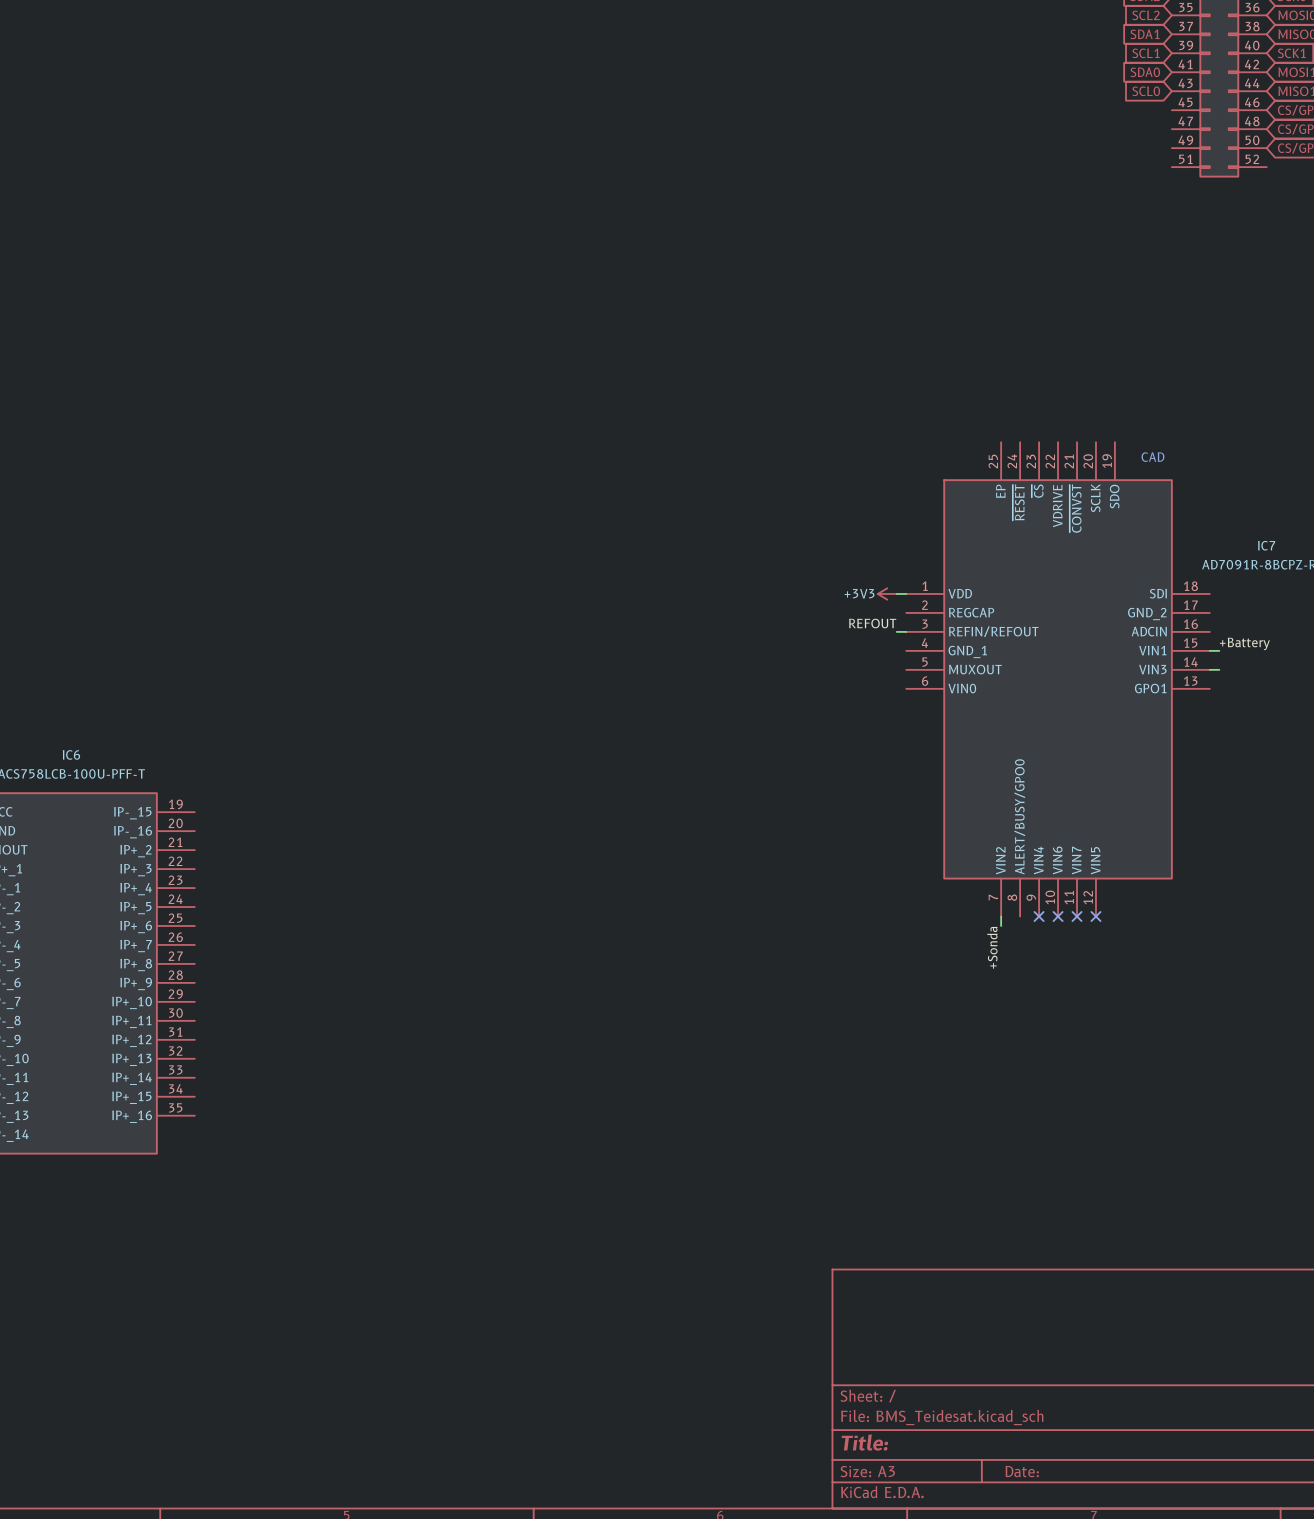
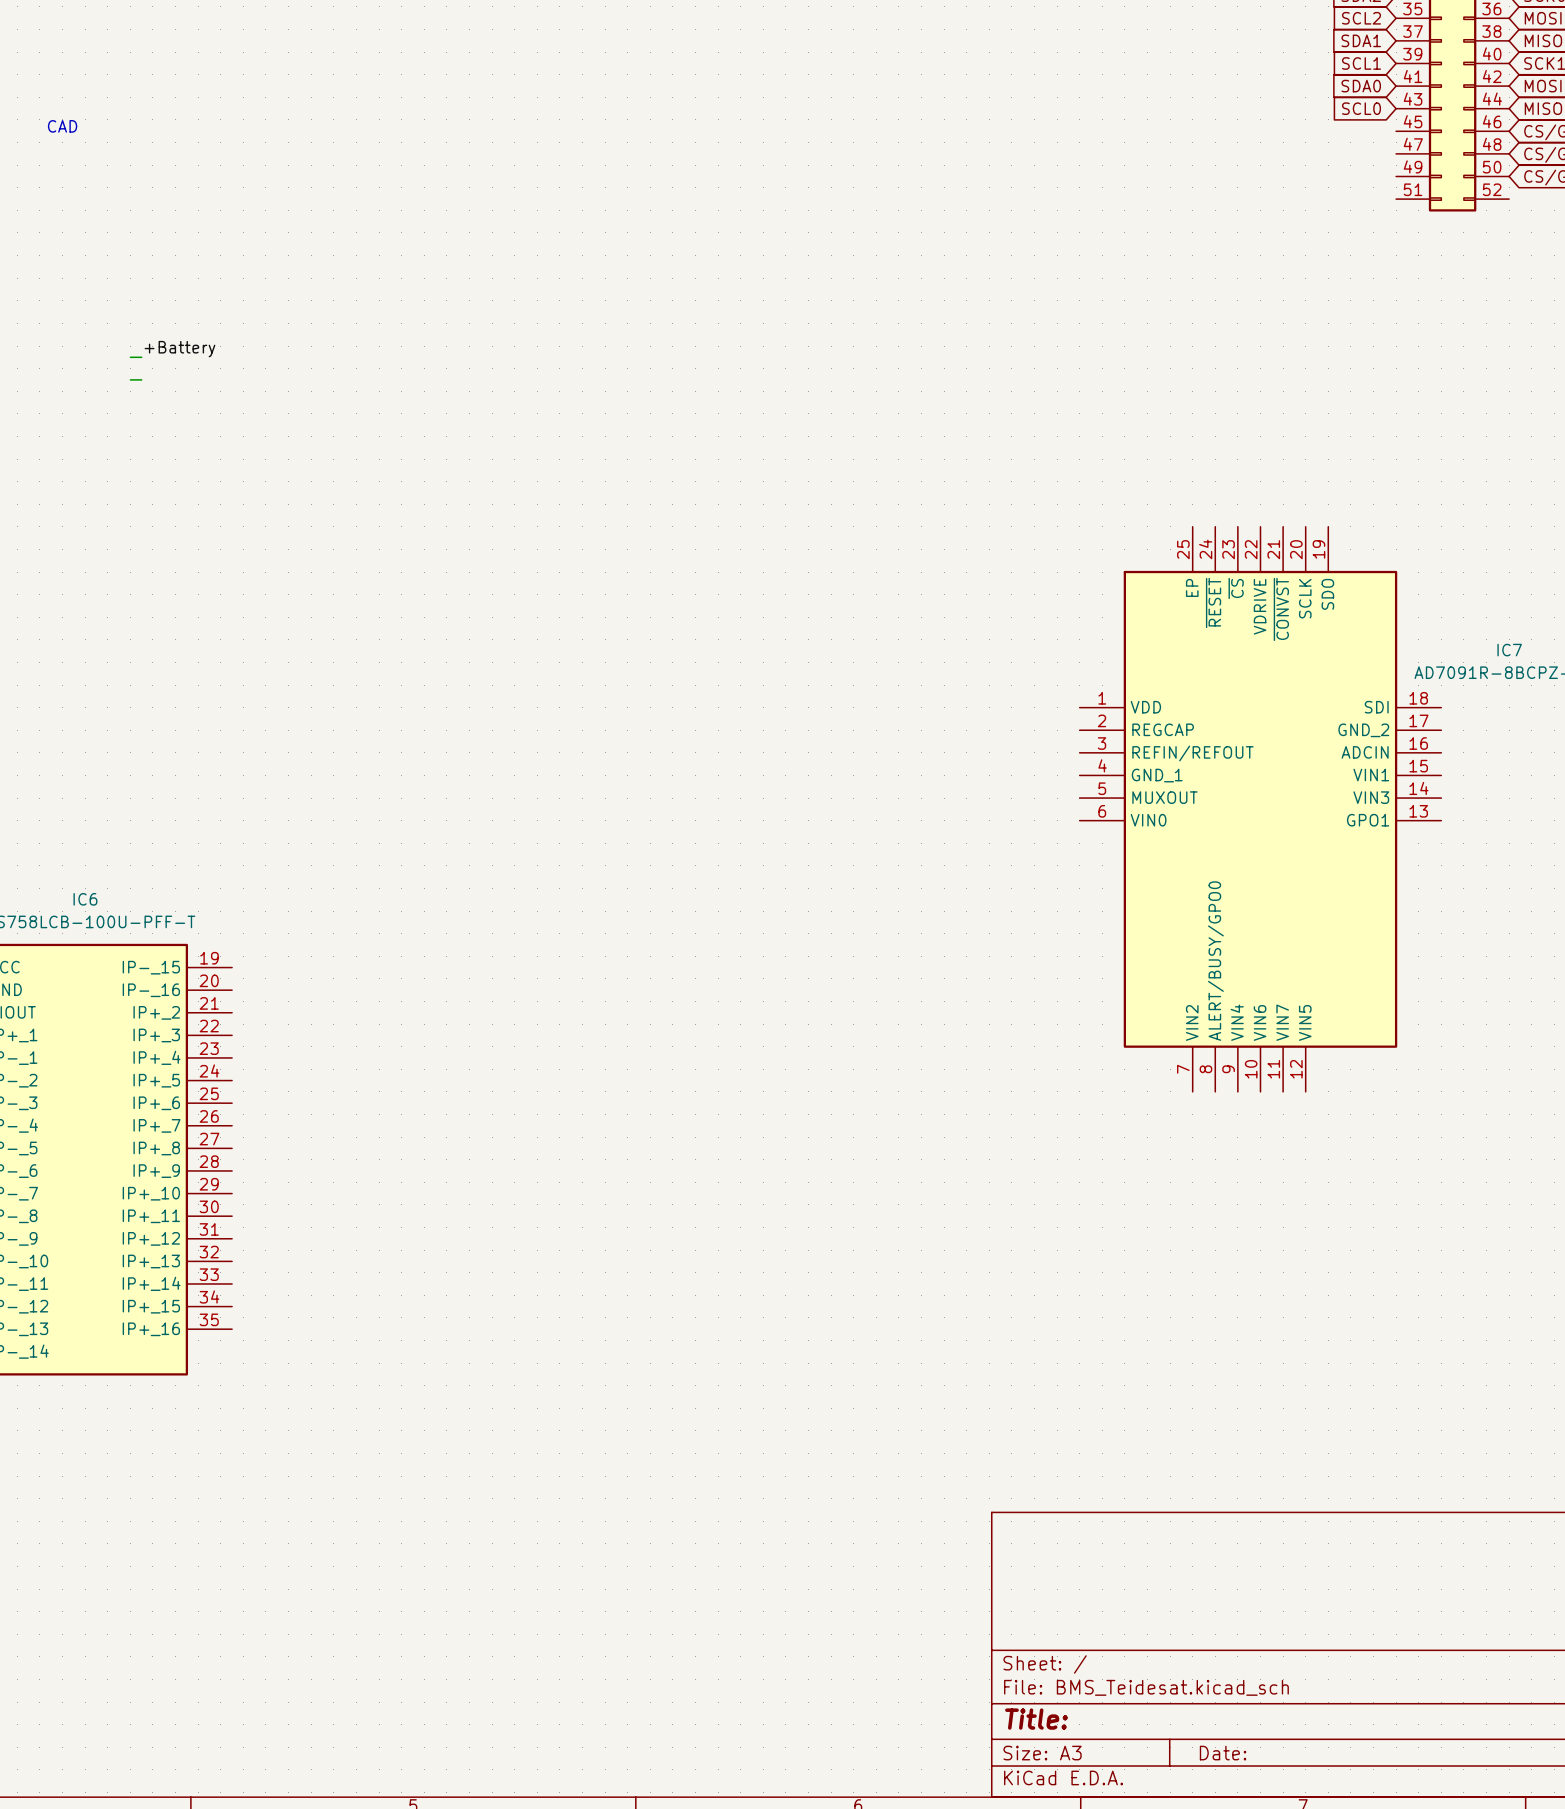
text: none -> CAD (62, 126)
label: none -> +Battery (179, 349)
wire: none -> (130, 357) (141, 357)
wire: none -> (130, 379) (141, 379)
text: CAD (1152, 457) -> none
power symbol: +3V3 (887, 593) -> none
wire: (896, 593) (906, 593) -> none
label: REFOUT (872, 623) -> none
wire: (896, 631) (906, 631) -> none
label: +Battery (1244, 643) -> none
wire: (1209, 650) (1219, 650) -> none
wire: (1209, 669) (1219, 669) -> none
wire: (1001, 916) (1001, 925) -> none
no-connect mark: (1039, 916) -> none
no-connect mark: (1058, 916) -> none
no-connect mark: (1077, 916) -> none
no-connect mark: (1095, 916) -> none
label: +Sonda (992, 947) -> none

